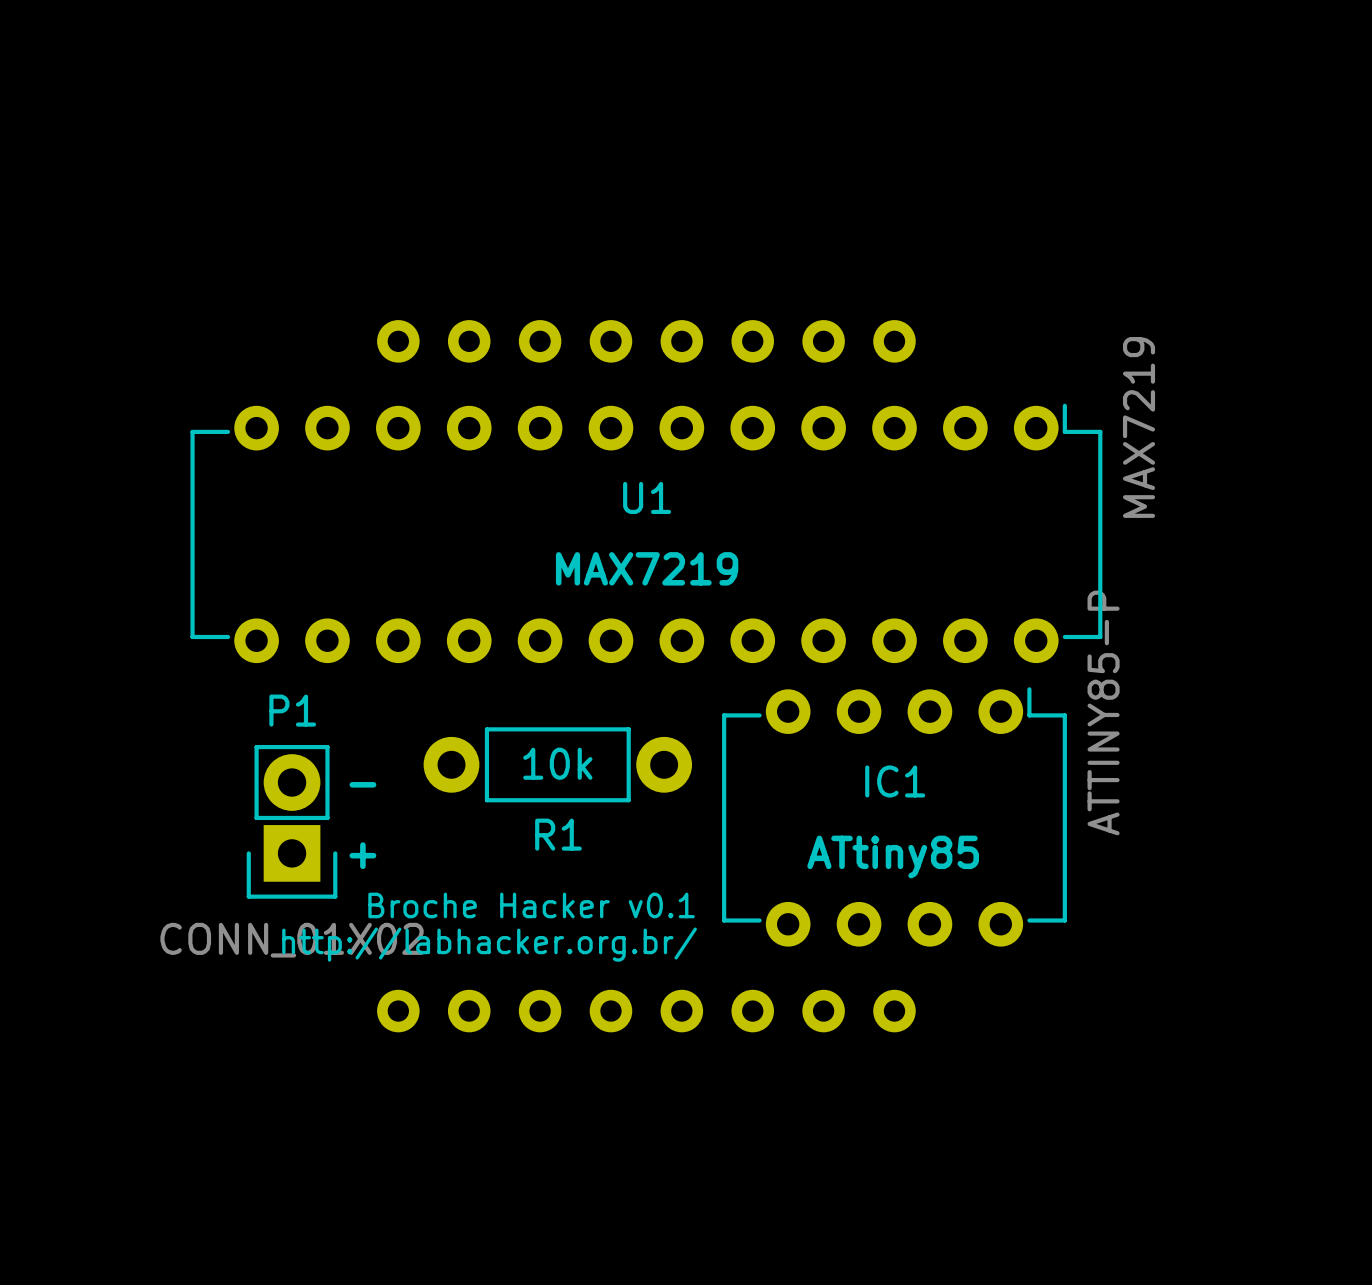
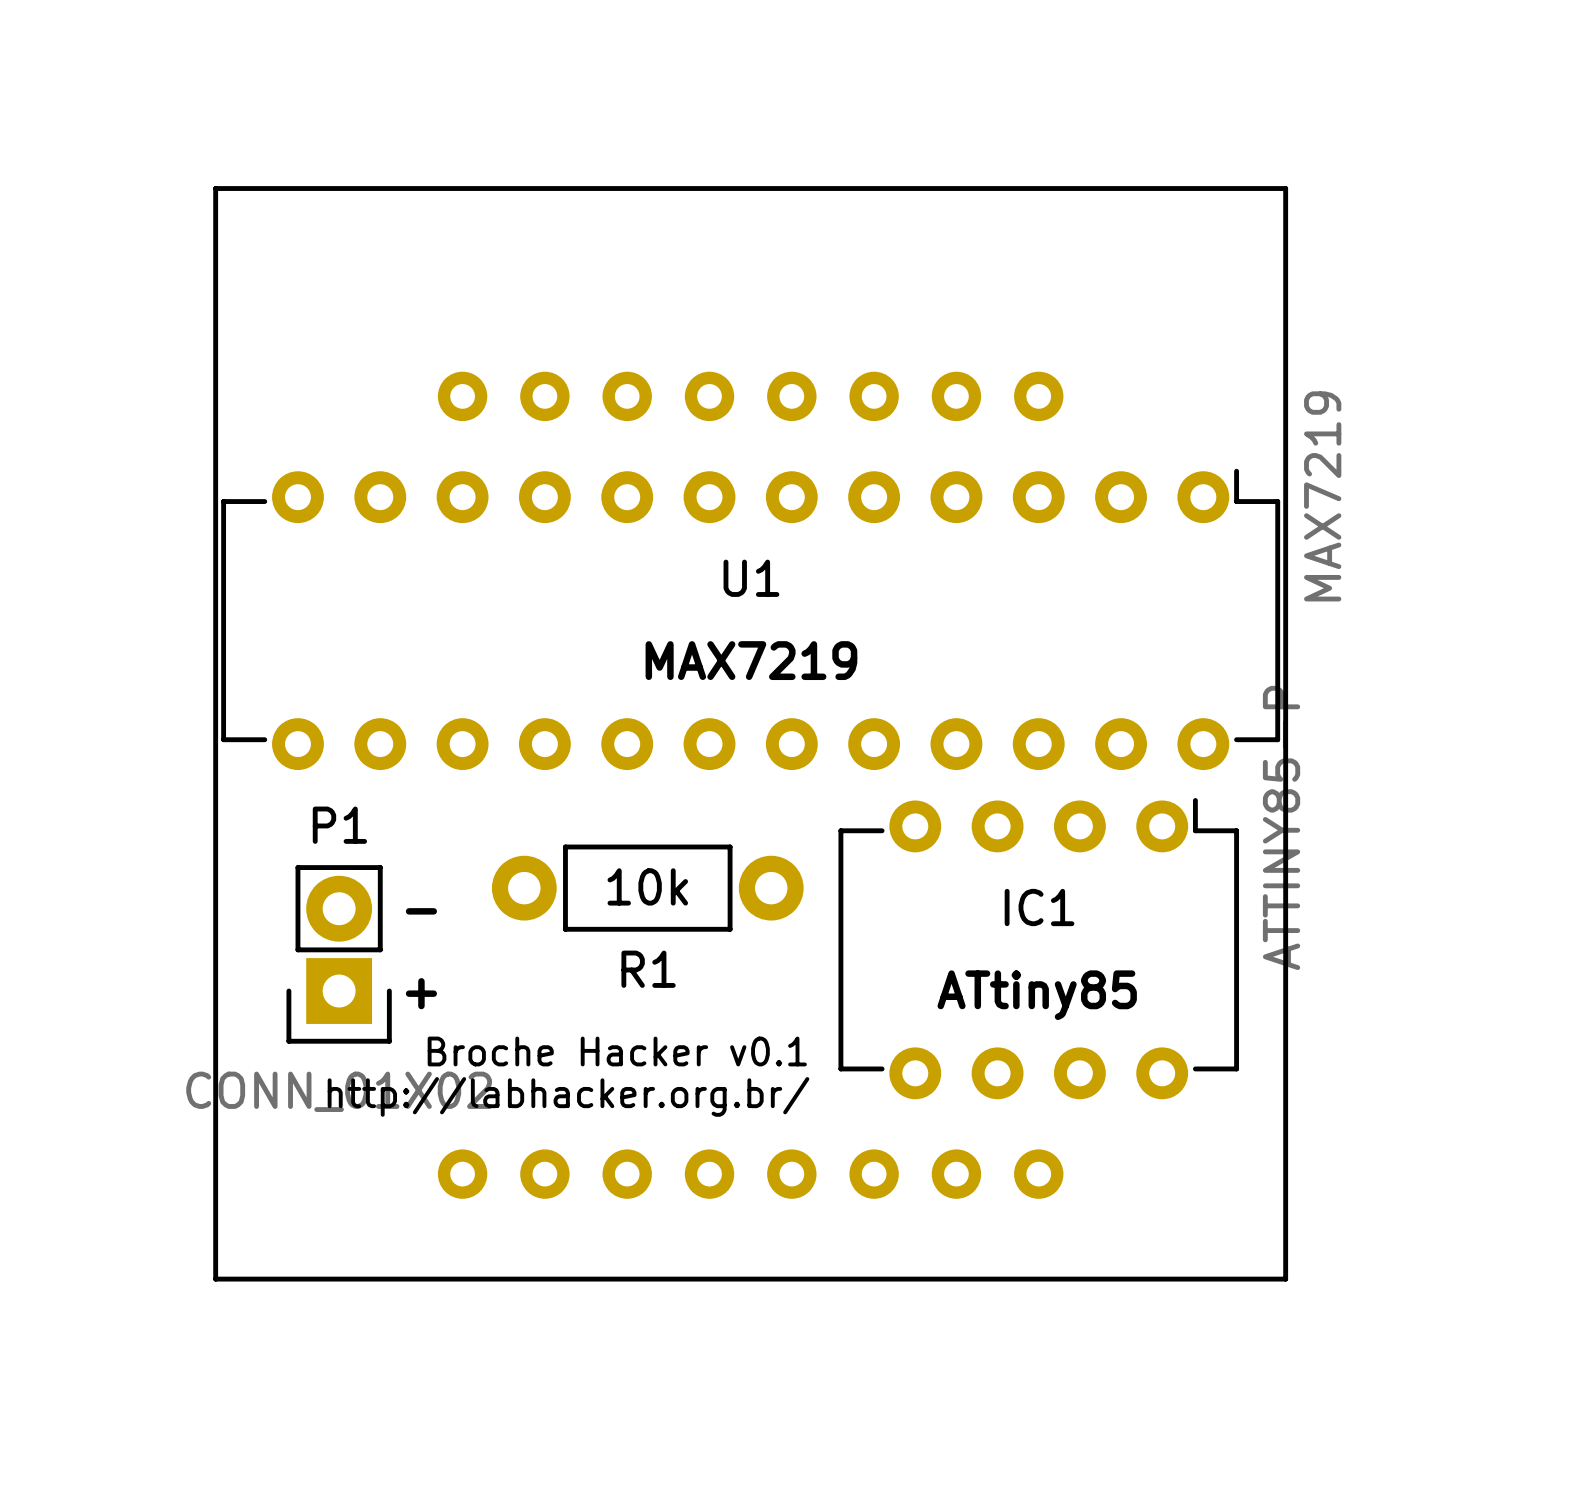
board edge: none -> (215, 188) (215, 1279) (1285, 1279) (1285, 188) (215, 188)

